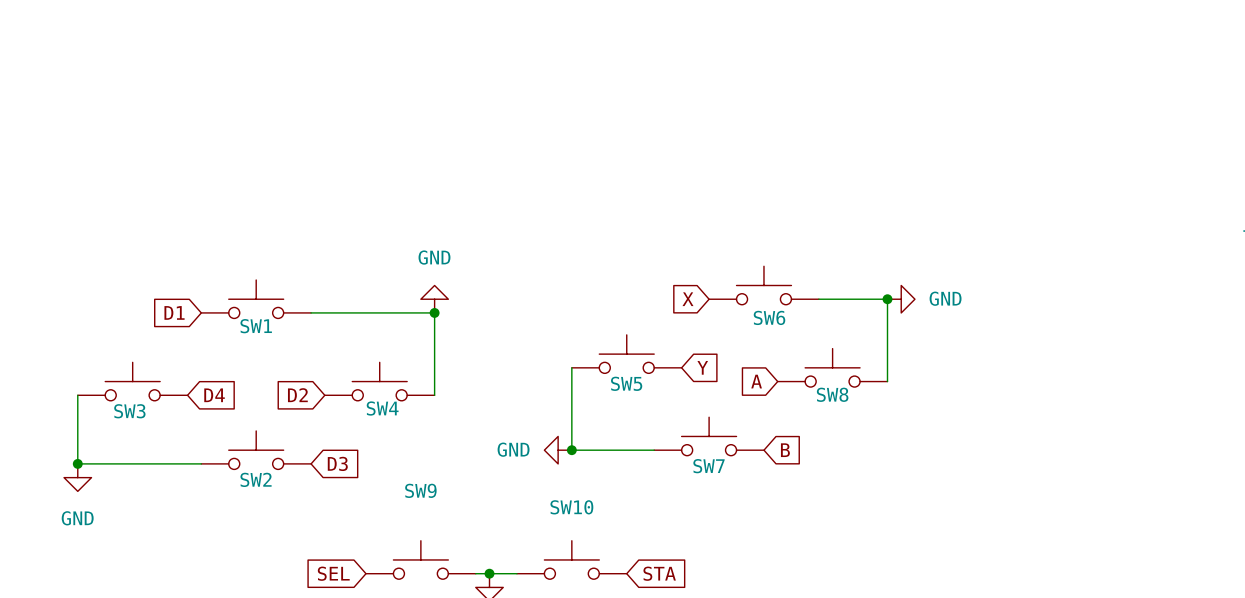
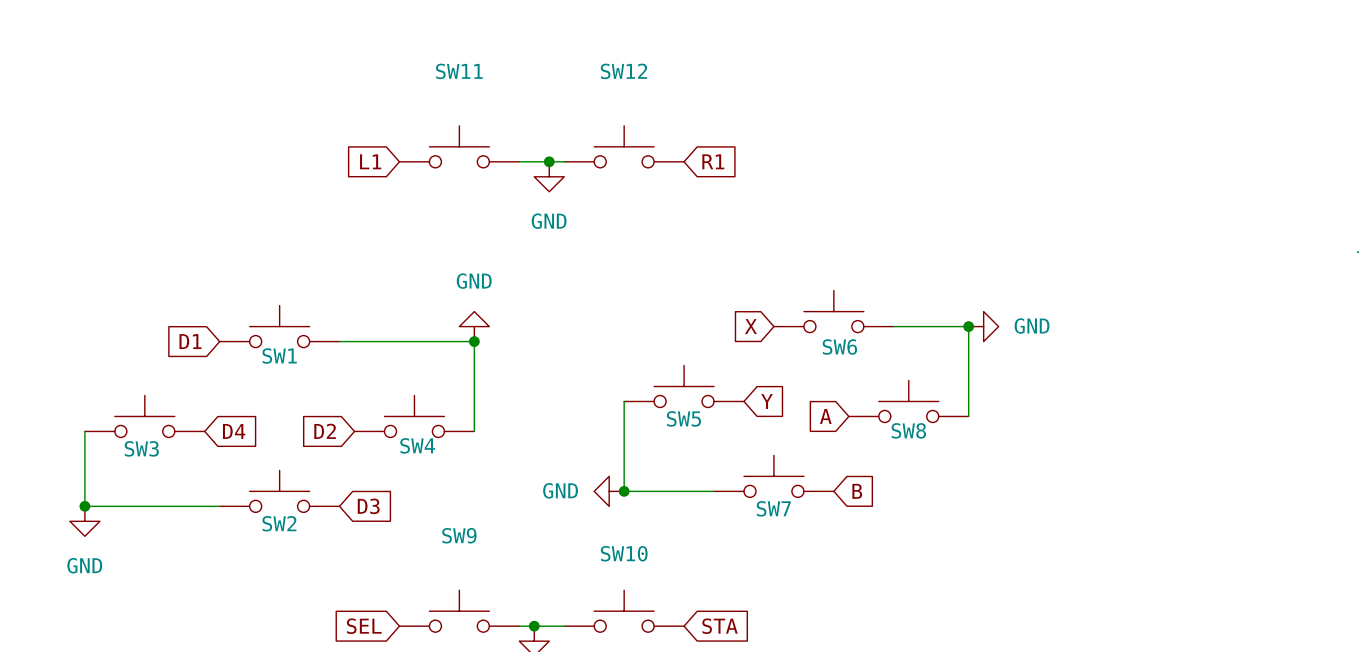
SW11: none -> (459, 146)
SW12: none -> (624, 146)
global label: none -> L1 (370, 161)
wire: none -> (519, 161) (564, 161)
junction: none -> (549, 161)
global label: none -> R1 (713, 161)
power symbol: none -> GND (549, 176)

